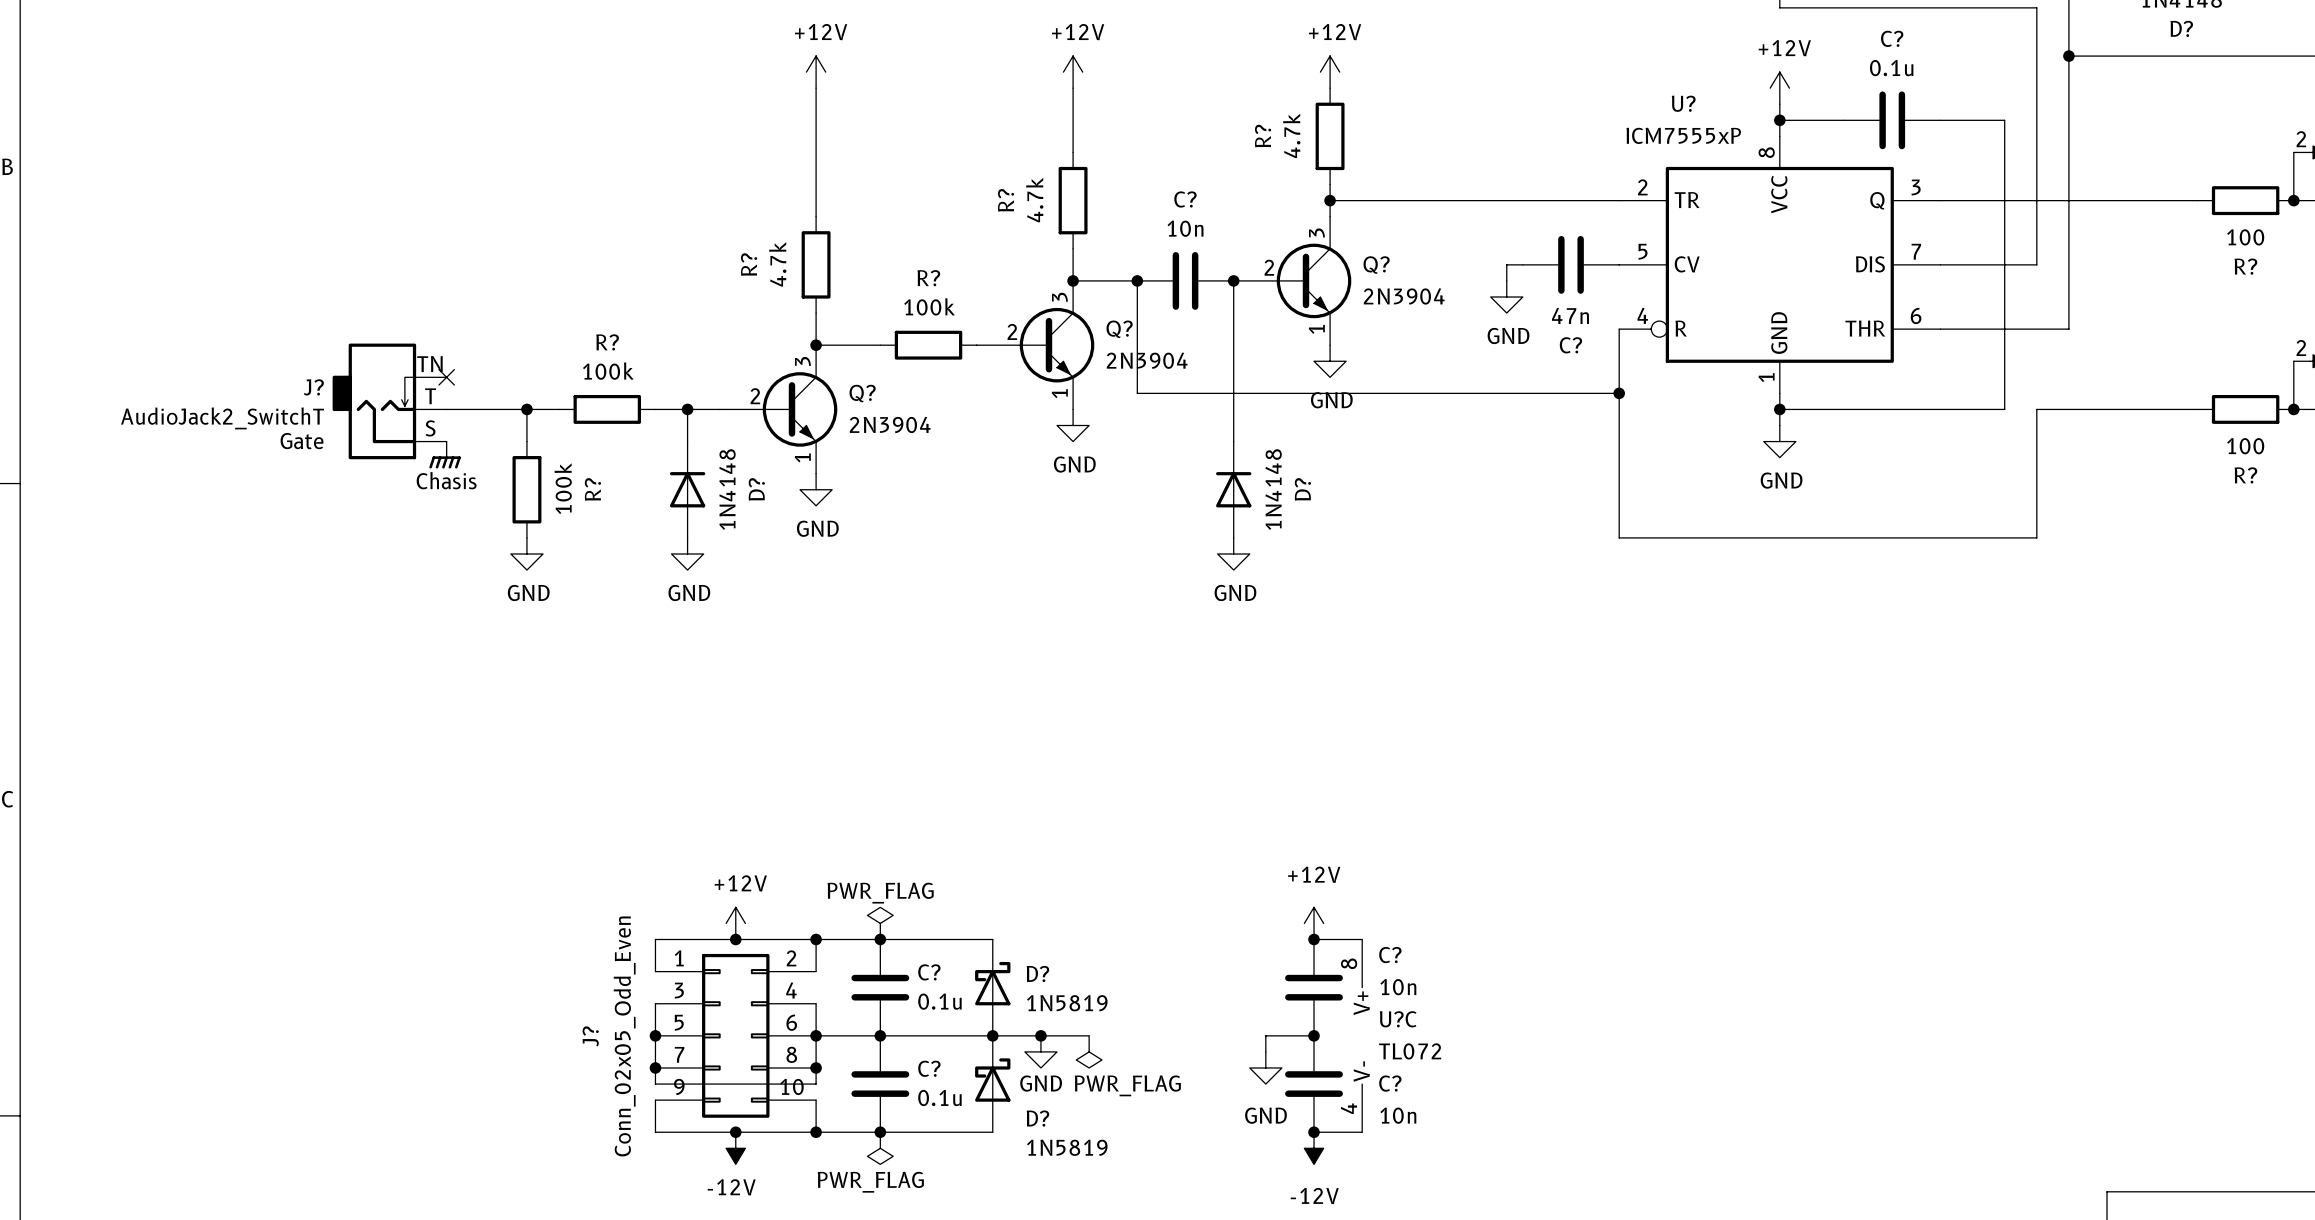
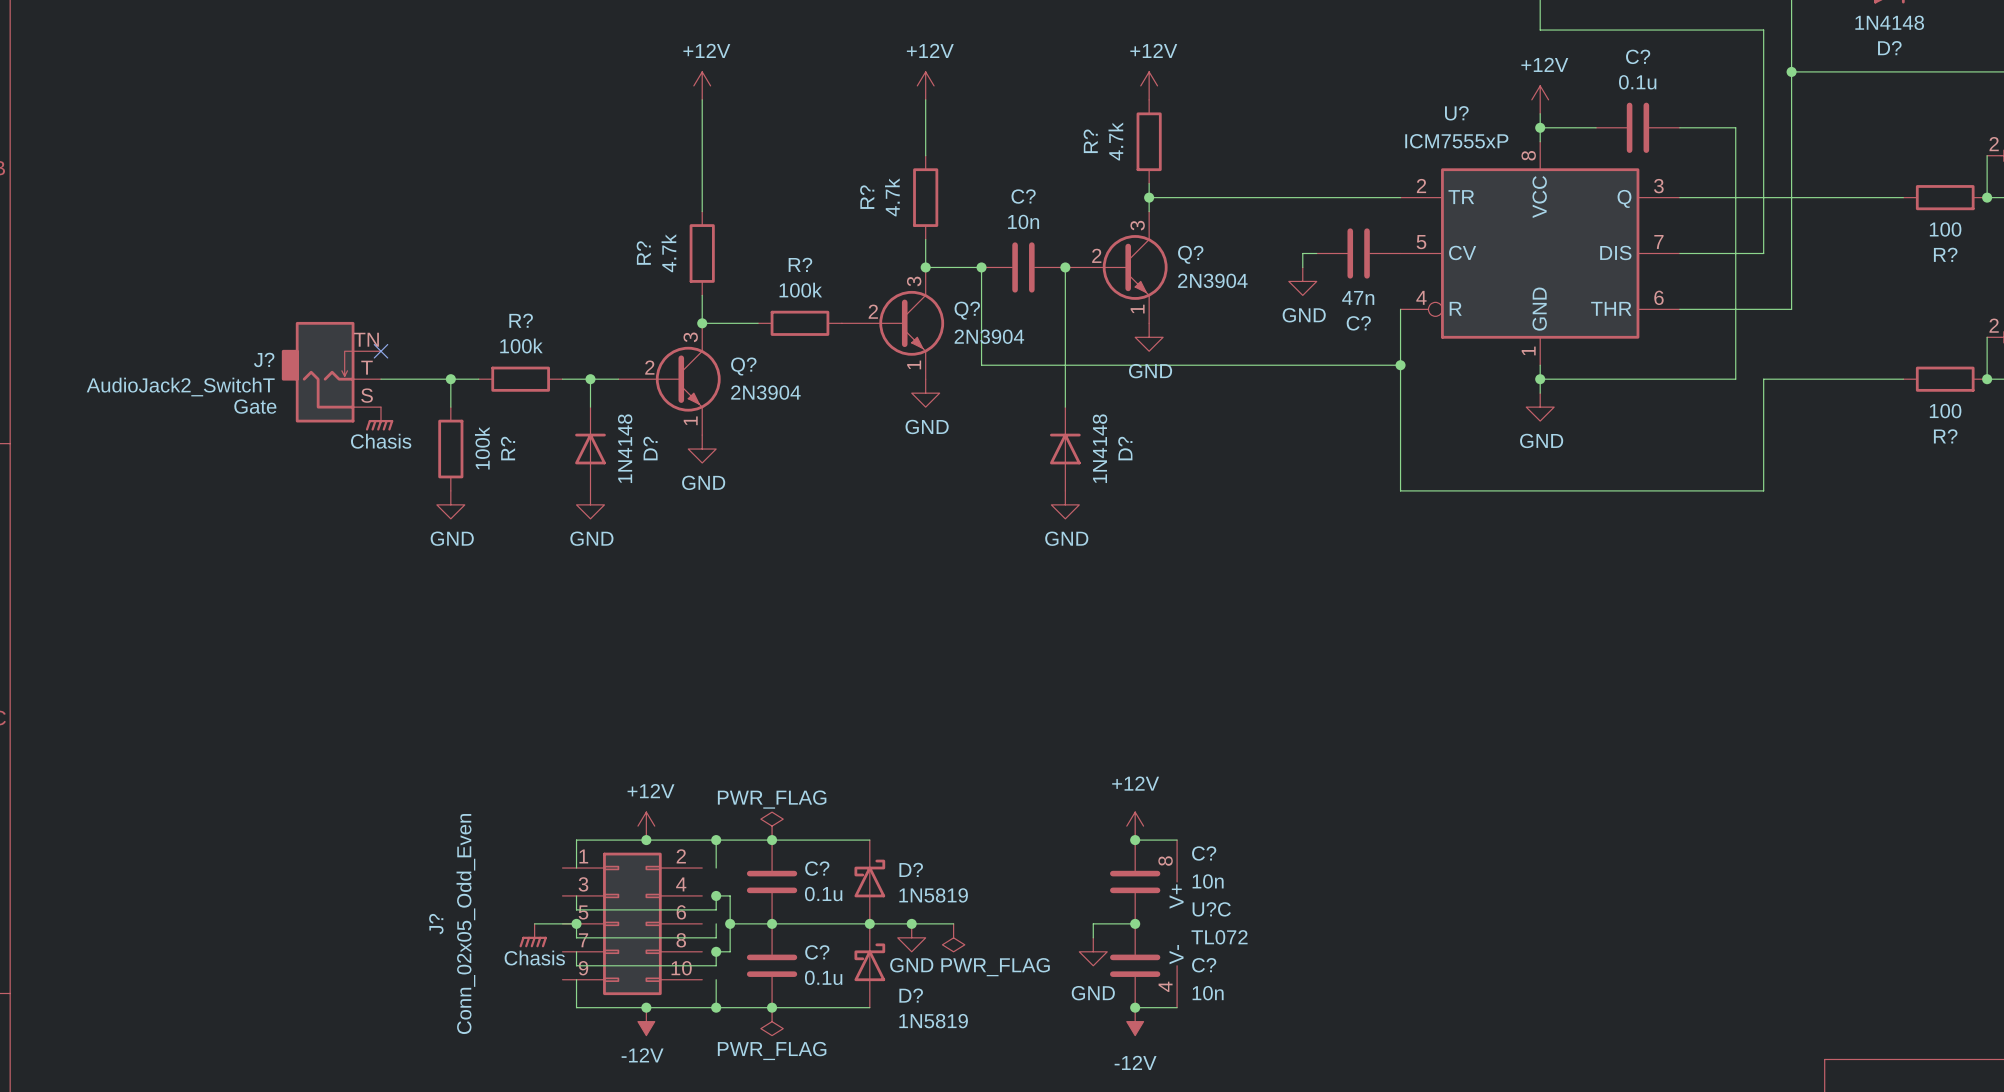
power symbol position: +12V (735, 923) -> +12V (646, 826)
power symbol position: PWR_FLAG (880, 923) -> PWR_FLAG (772, 826)
wire: (671, 939) (655, 939) (655, 971) -> (576, 840) (576, 868)
junction position: (735, 939) -> (646, 840)
wire: (816, 939) (816, 971) -> (716, 840) (716, 868)
junction position: (816, 939) -> (716, 840)
junction position: (880, 939) -> (772, 840)
wire: none -> (855, 840) (869, 840)
C? position: (880, 987) -> (772, 881)
D? position: (992, 987) -> (869, 881)
wire: (655, 1003) (655, 1084) (671, 1084) -> (576, 951) (576, 965)
wire: (816, 1003) (816, 1084) -> (576, 895) (576, 909) (716, 909) (716, 895) (730, 895) (730, 951) (716, 951) (716, 965) (702, 965)
junction: none -> (716, 895)
wire: none -> (534, 923) (576, 923) (576, 937) (716, 937) (716, 923)
junction position: (655, 1035) -> (576, 923)
wire: (816, 1035) (848, 1035) -> none
junction: (816, 1035) -> none
junction: none -> (730, 923)
junction: (880, 1035) -> none
junction: none -> (772, 923)
junction: (992, 1035) -> none
junction: none -> (869, 923)
junction: (1040, 1035) -> none
junction: none -> (911, 923)
wire: none -> (939, 923) (953, 923)
J? name position: J? (590, 1036) -> J? (436, 924)
J? value position: Conn_02x05_Odd_Even (624, 1036) -> Conn_02x05_Odd_Even (465, 924)
power symbol: none -> Chasis (533, 935)
power symbol position: GND (1040, 1051) -> GND (911, 937)
power symbol position: PWR_FLAG (1089, 1051) -> PWR_FLAG (953, 937)
junction: (655, 1067) -> none
junction position: (816, 1067) -> (716, 951)
C? position: (880, 1084) -> (772, 965)
D? position: (992, 1084) -> (869, 965)
wire: (655, 1100) (655, 1132) (671, 1132) -> (576, 979) (576, 1007)
wire: (816, 1100) (816, 1132) -> (716, 979) (716, 1007)
junction position: (735, 1132) -> (646, 1007)
junction position: (816, 1132) -> (716, 1007)
junction position: (880, 1132) -> (772, 1007)
wire: none -> (855, 1007) (869, 1007)
power symbol position: -12V (735, 1148) -> -12V (646, 1021)
power symbol position: PWR_FLAG (880, 1148) -> PWR_FLAG (772, 1021)

